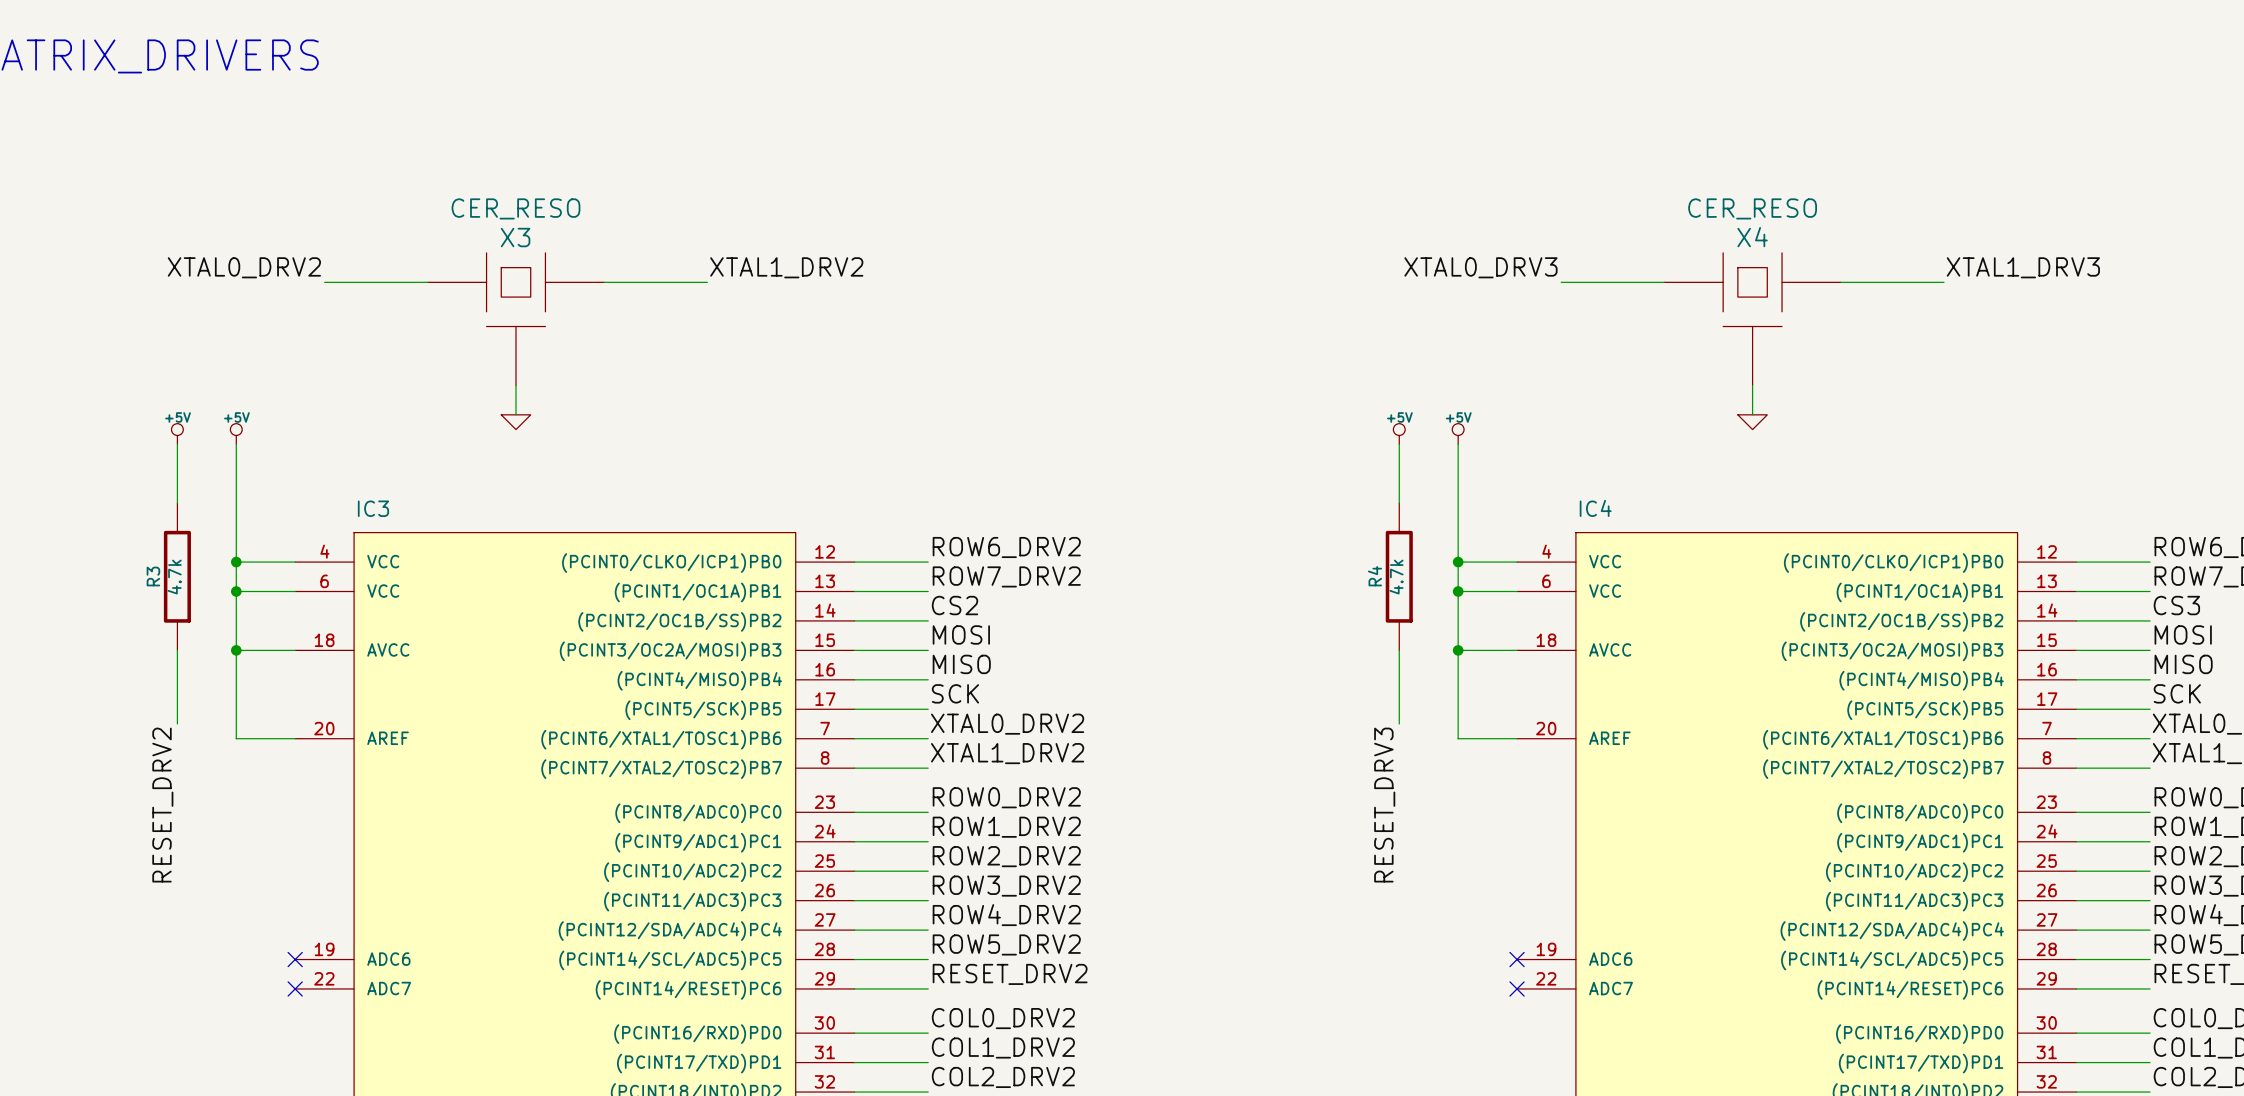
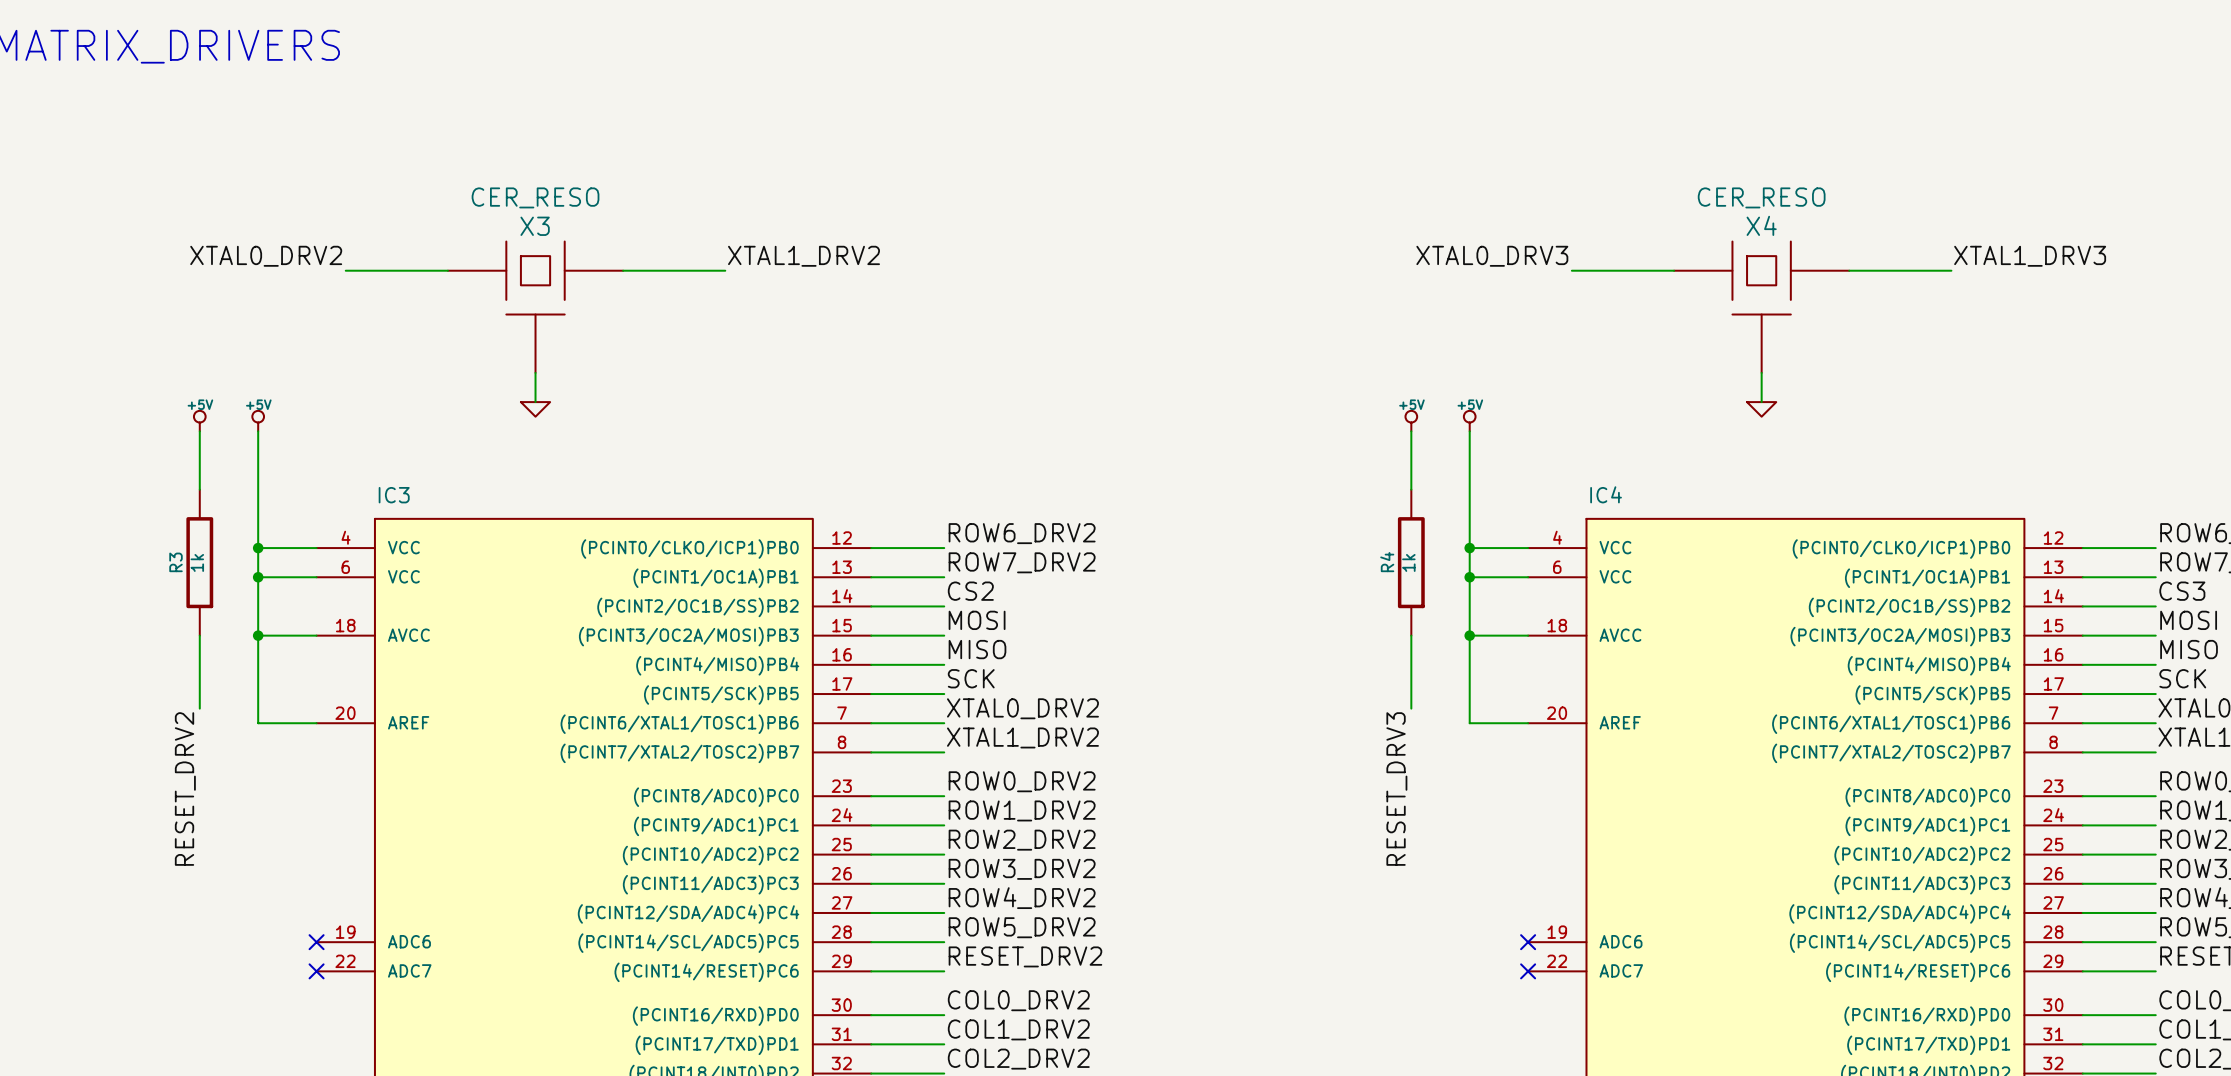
R3 value: 4.7k (174, 577) -> 1k (197, 562)
R4 value: 4.7k (1396, 577) -> 1k (1408, 562)

